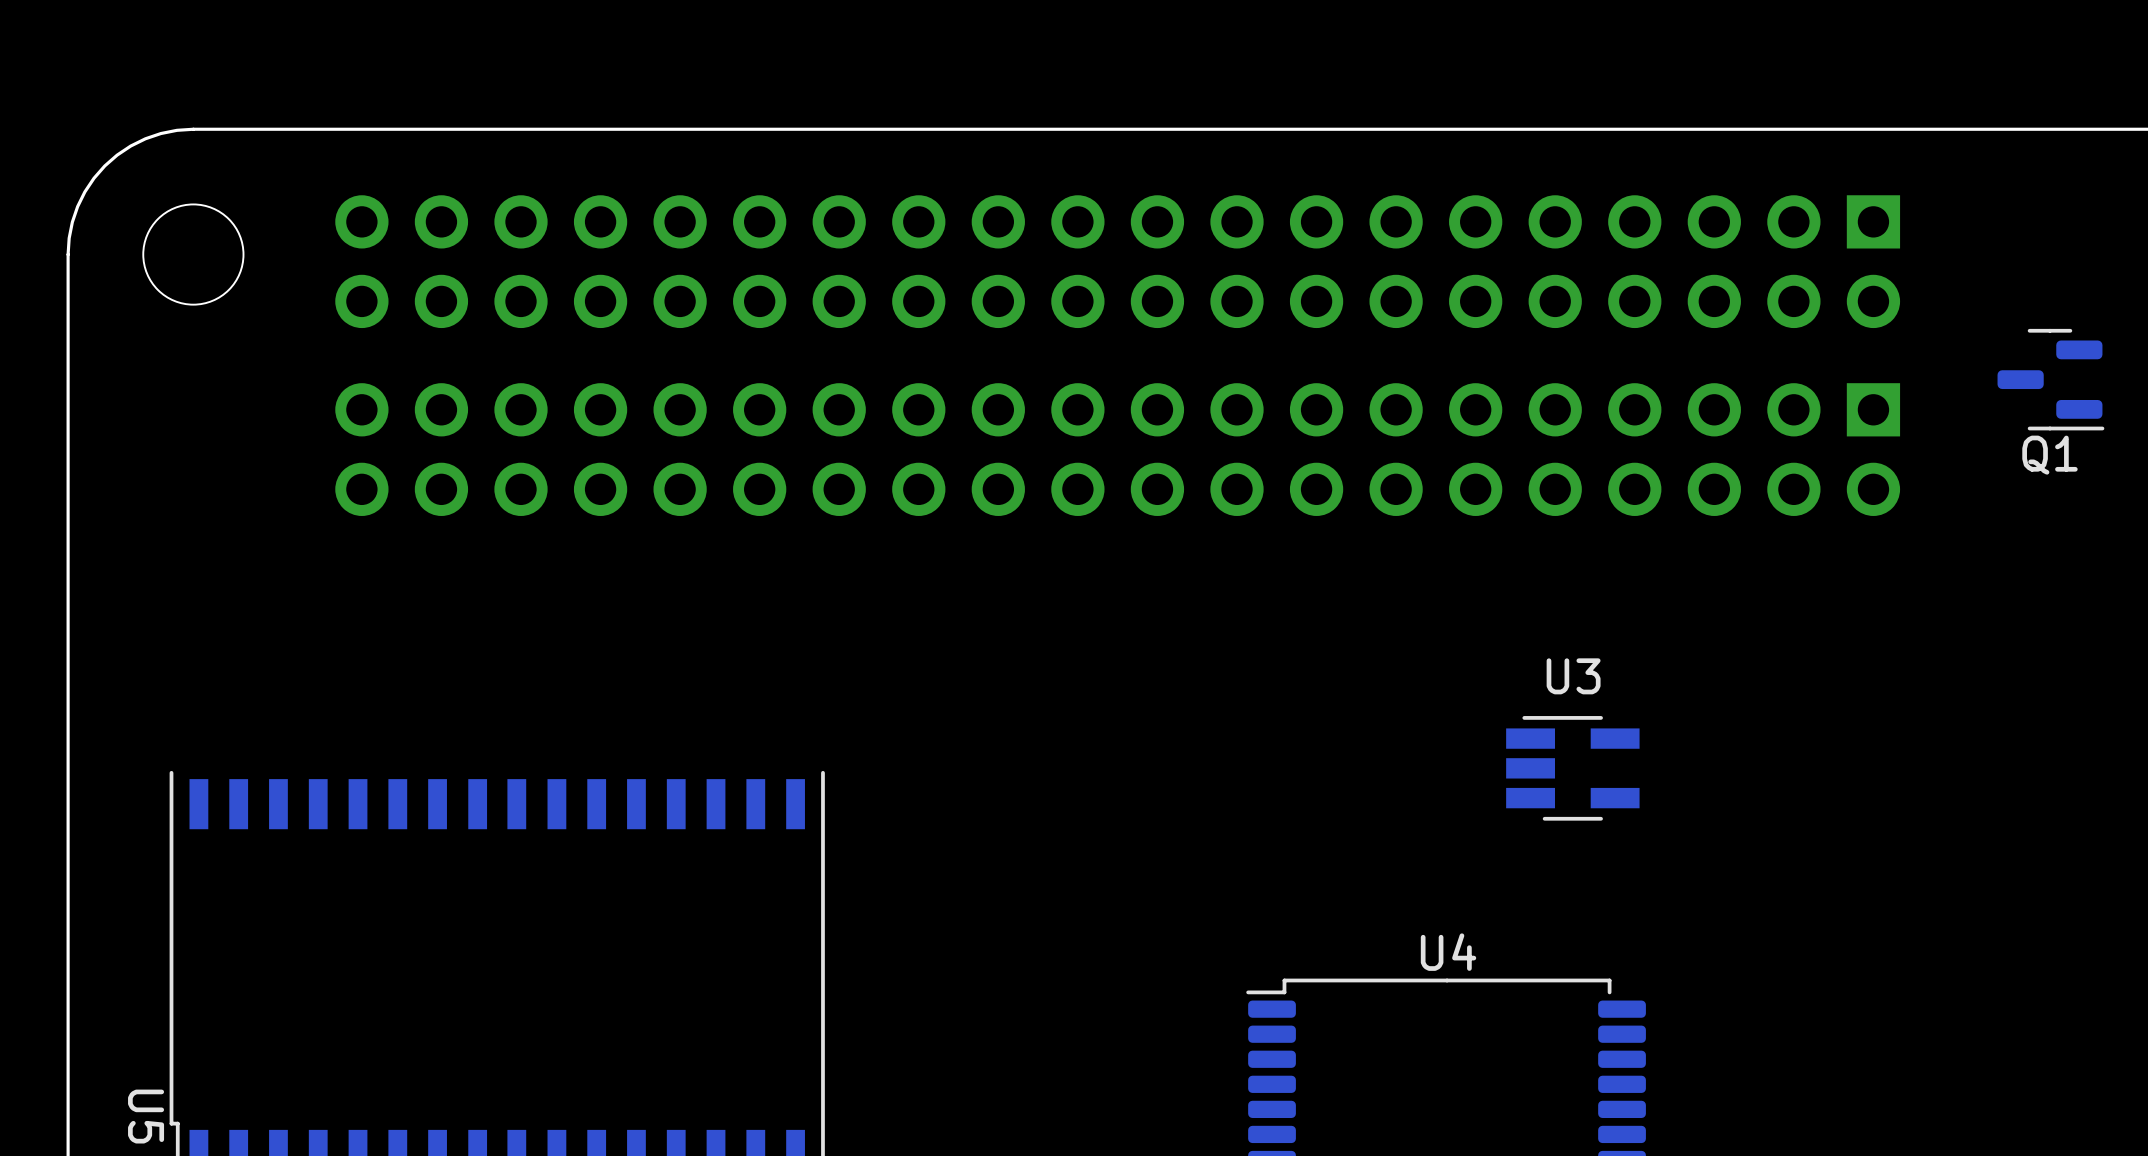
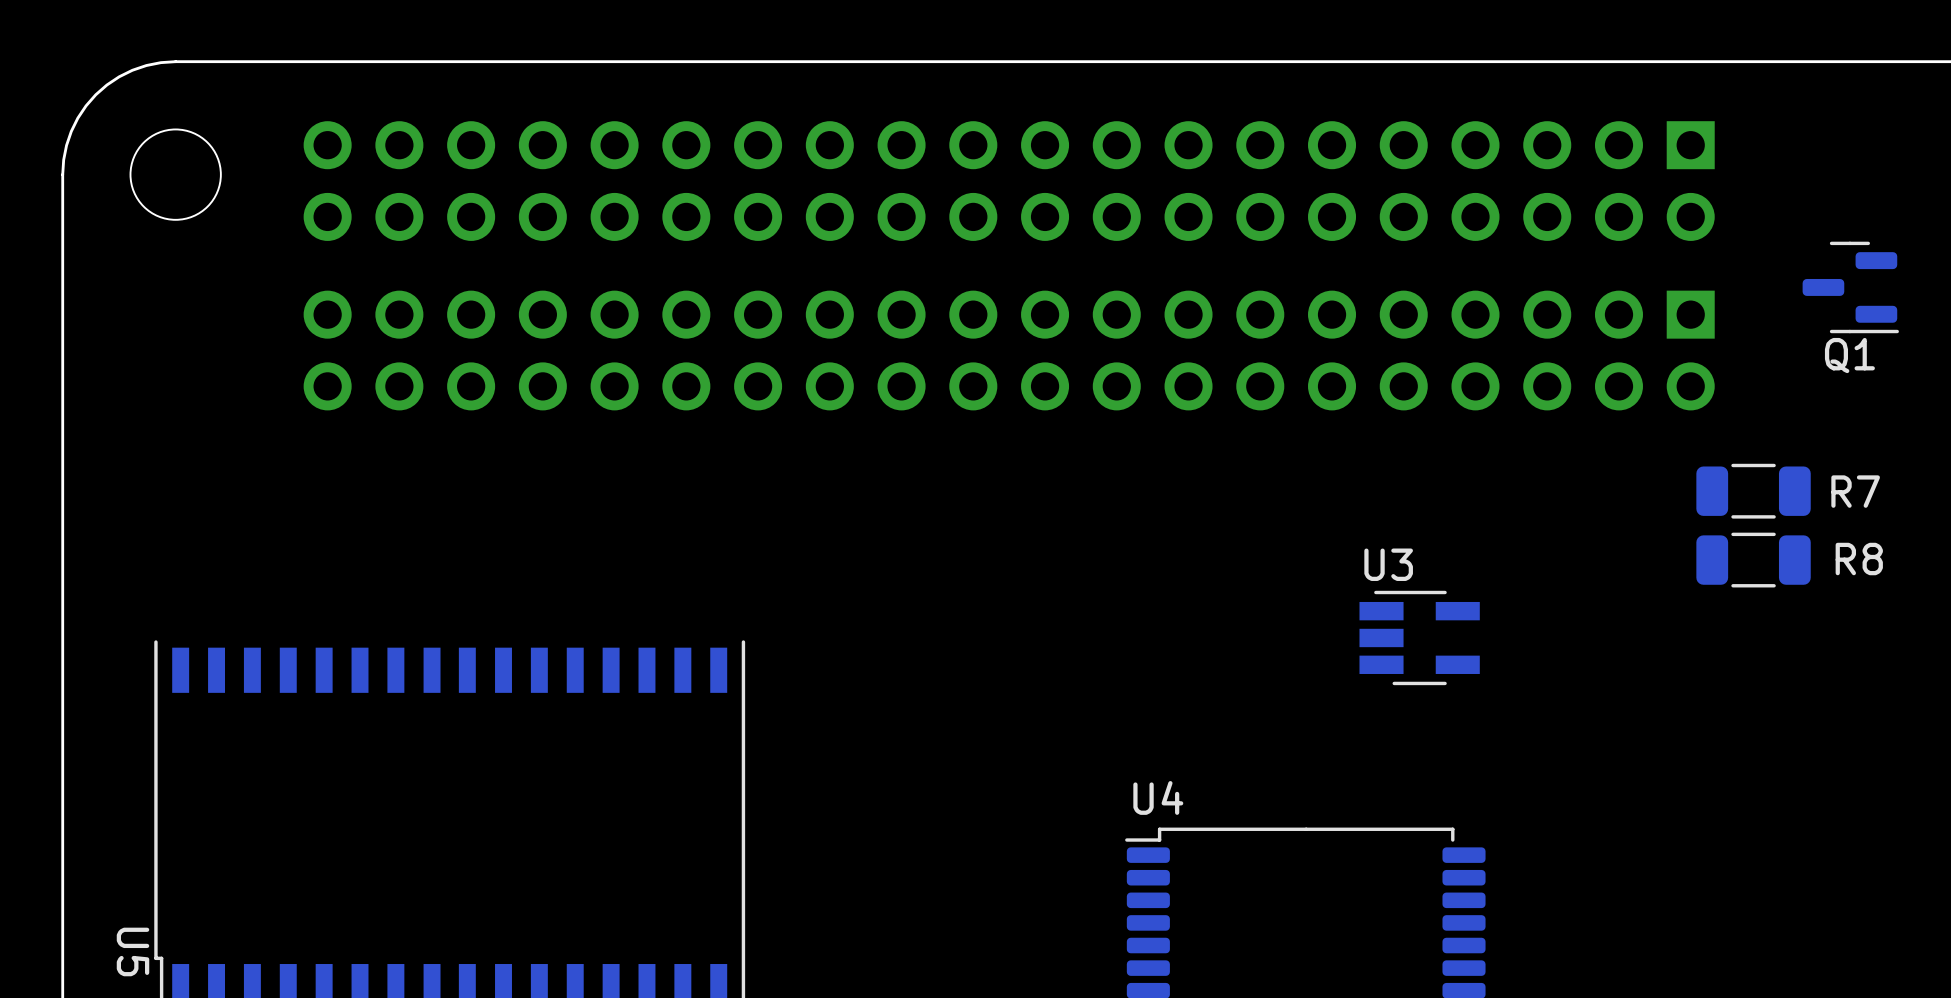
R7: none -> (1753, 491)
U3 name position: U3 (1573, 676) -> U3 (1388, 564)
R8: none -> (1753, 560)
U4 name position: U4 (1448, 952) -> U4 (1158, 797)

